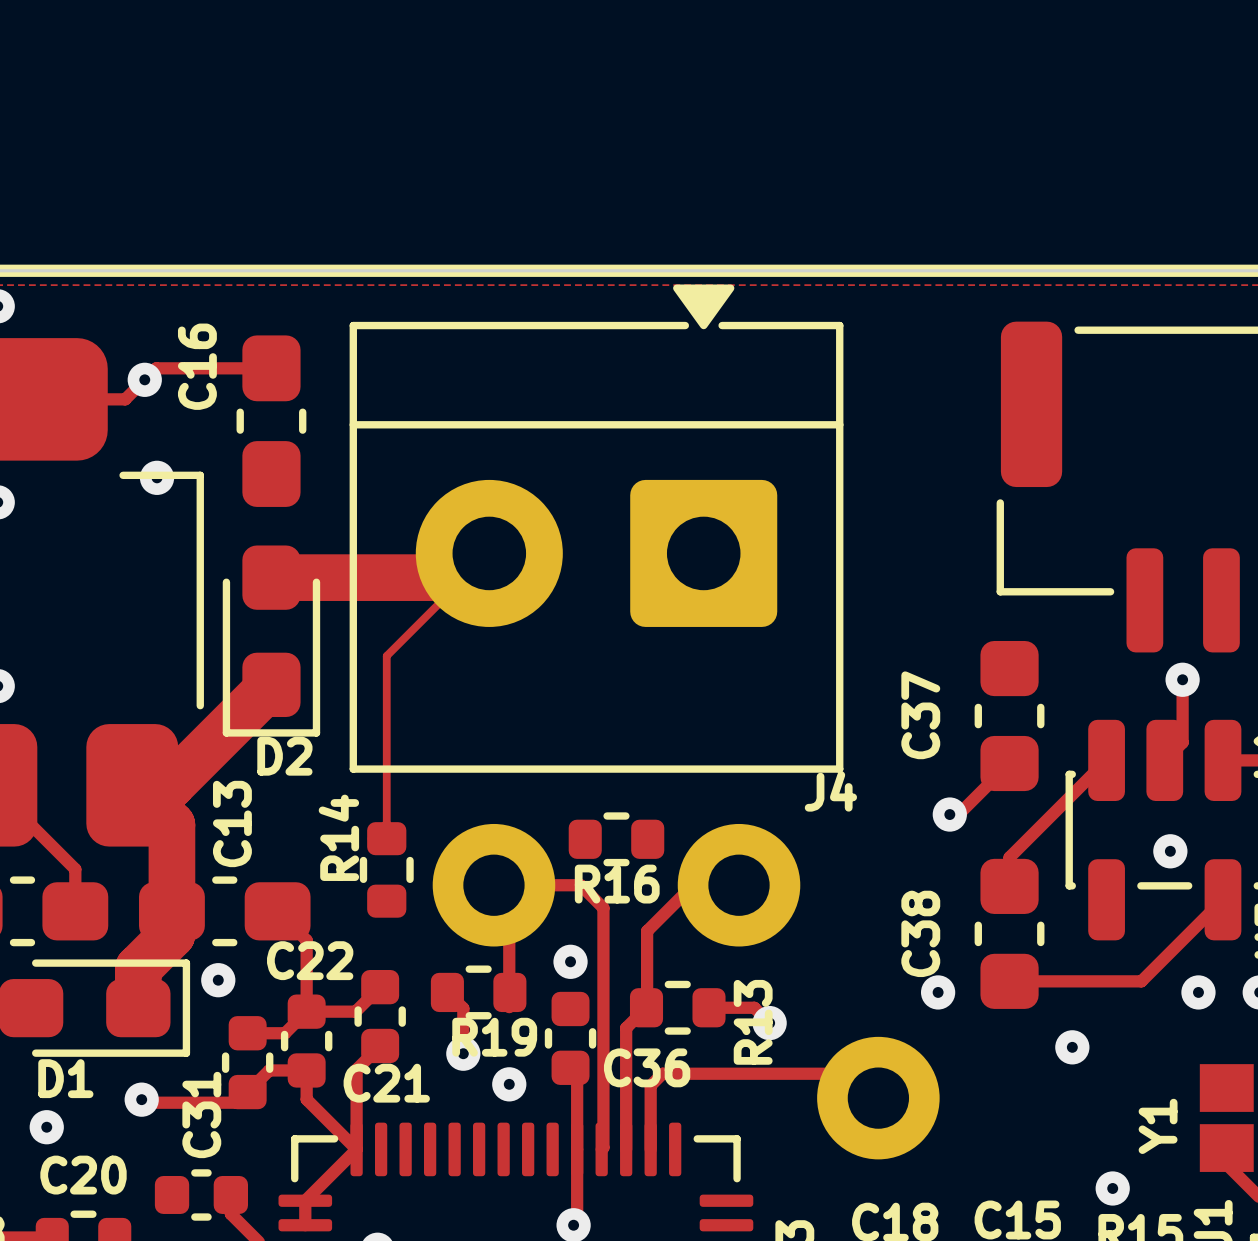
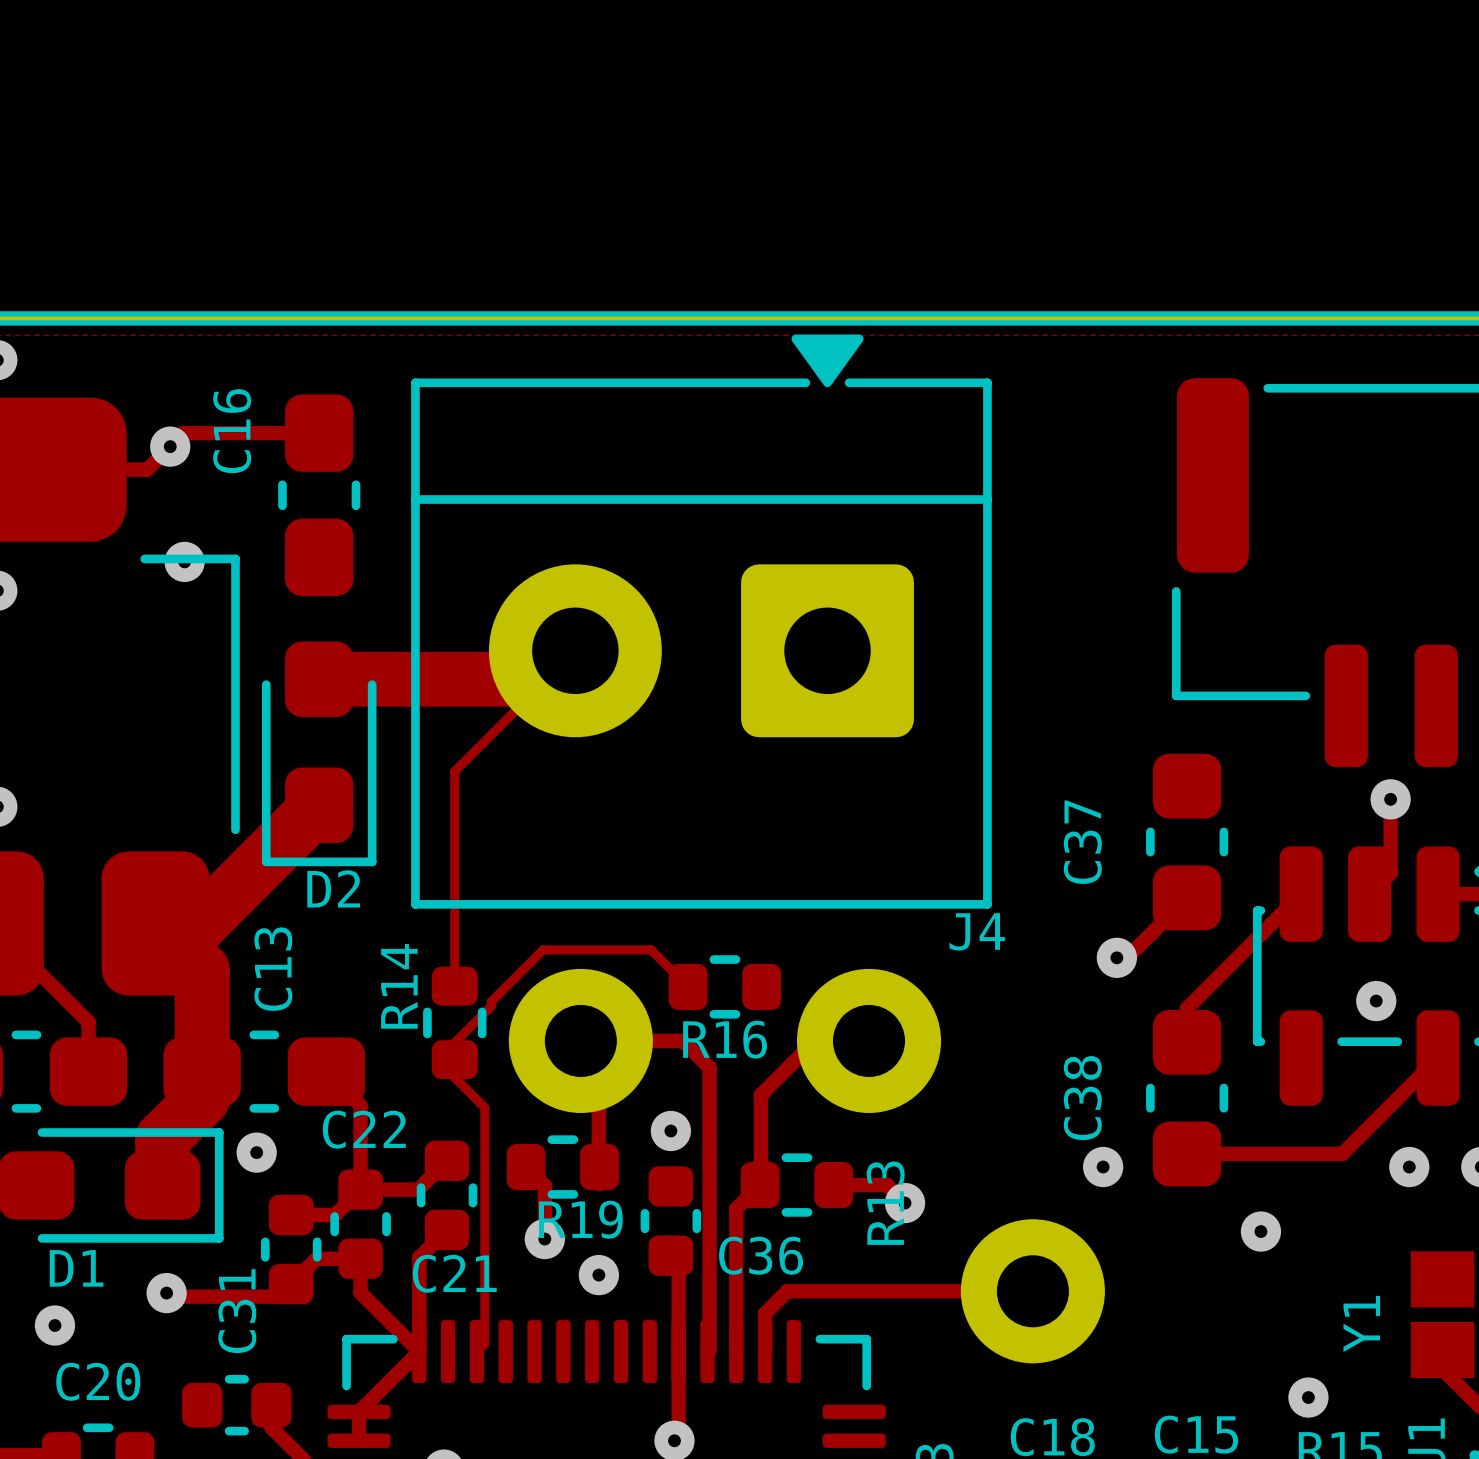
top track: none -> (688, 986) (651, 949) (543, 949) (491, 1001) (491, 1005) (454, 1042) (454, 1077) (484, 1107) (484, 1343) (476, 1351)
top track: (878, 1098) (854, 1073) (662, 1073) (650, 1085) (650, 1117) -> (1032, 1291) (787, 1291) (765, 1313)

